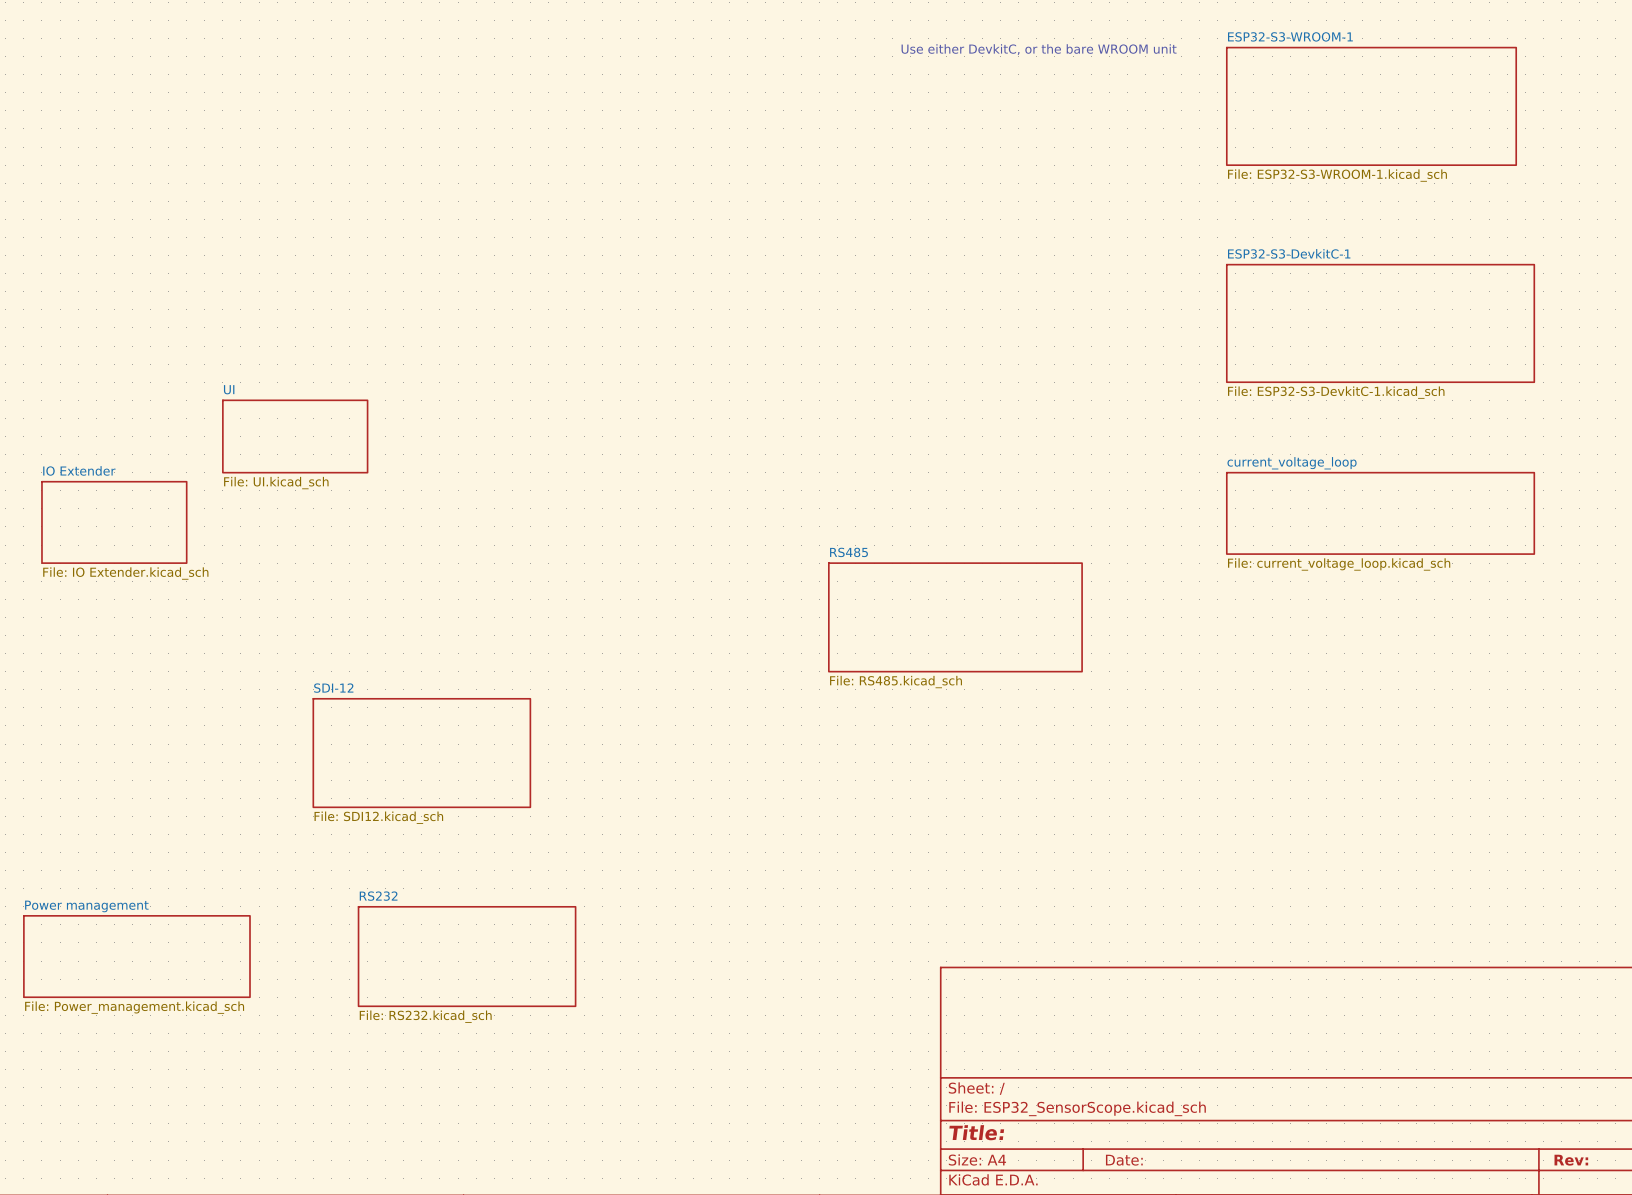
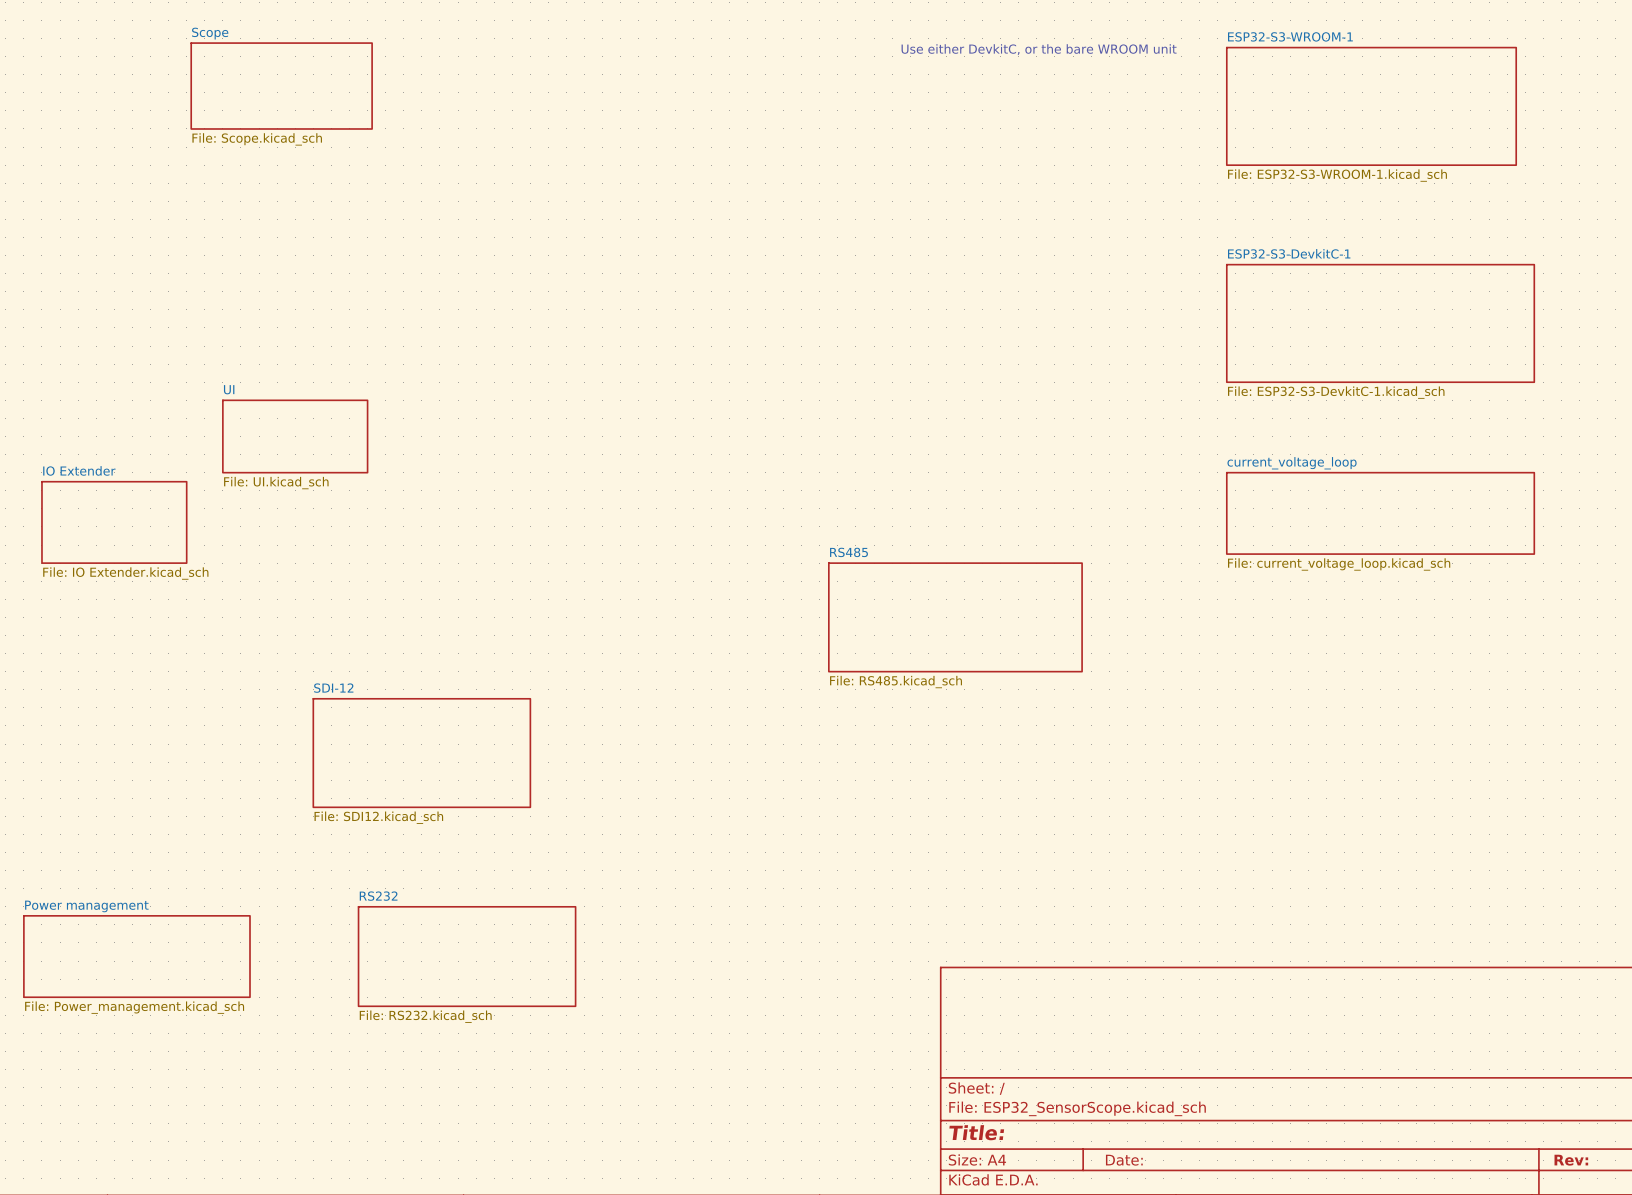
sheet Scope: none -> File: Scope.kicad_sch (281, 86)

